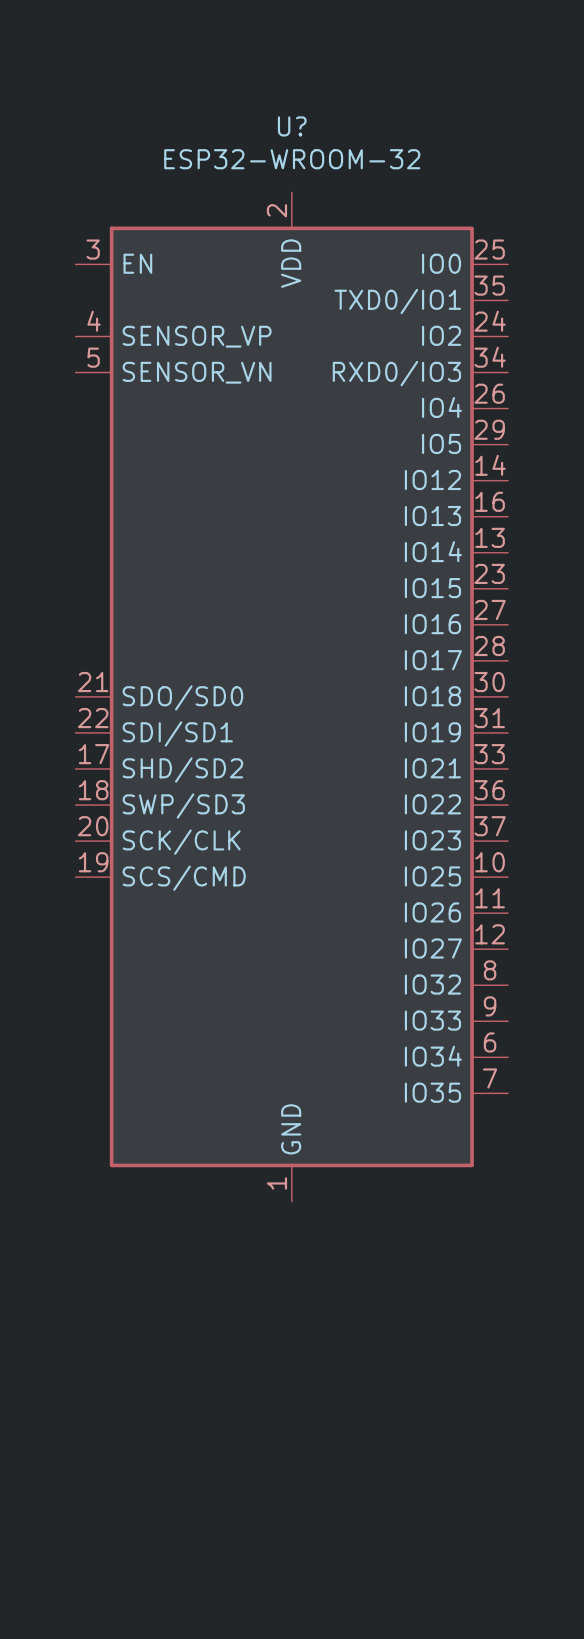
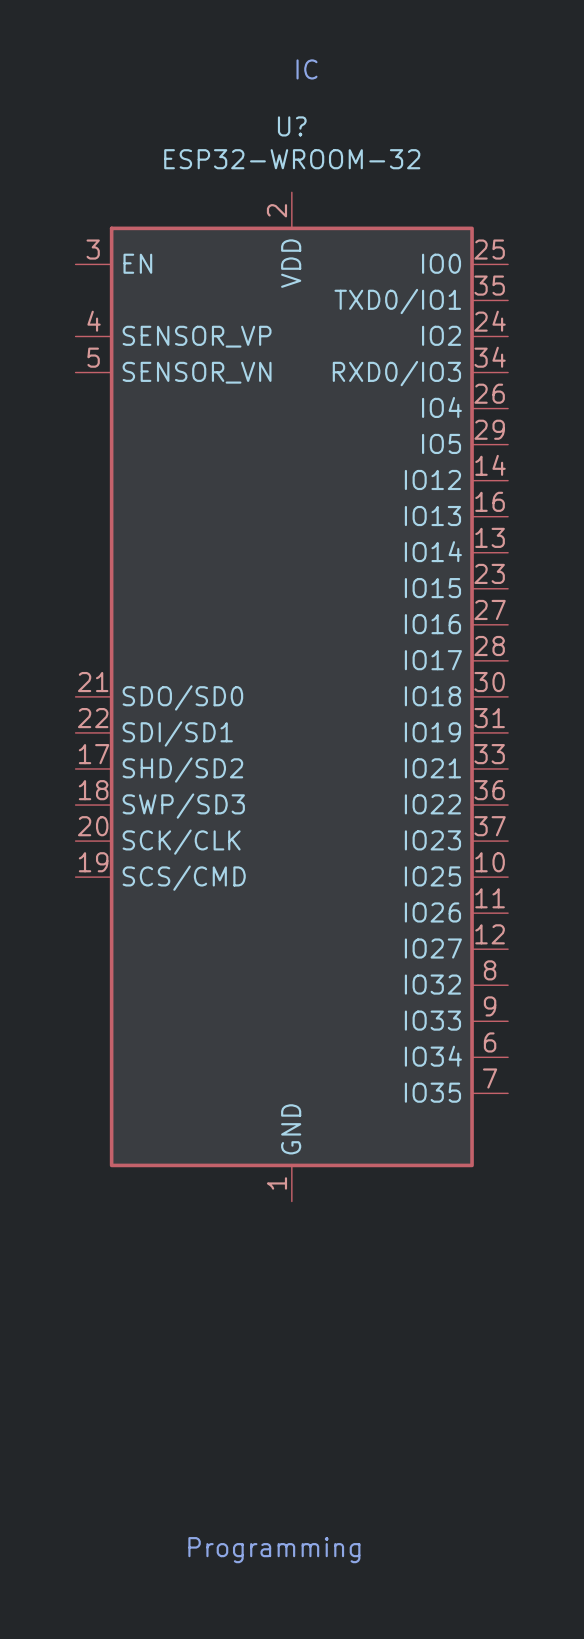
text: none -> IC (306, 69)
text: none -> Programming (274, 1550)

